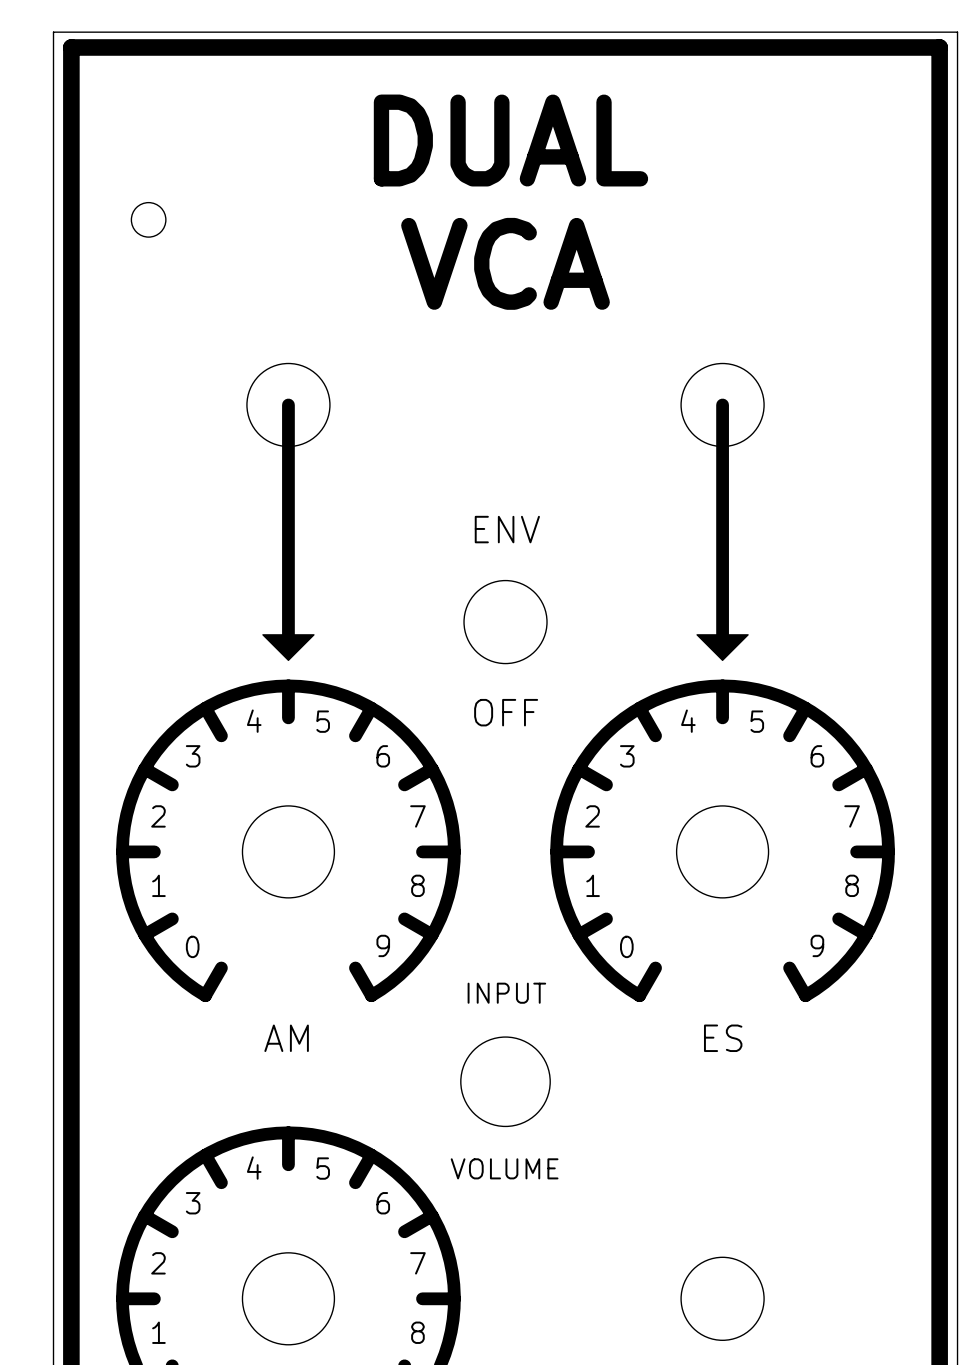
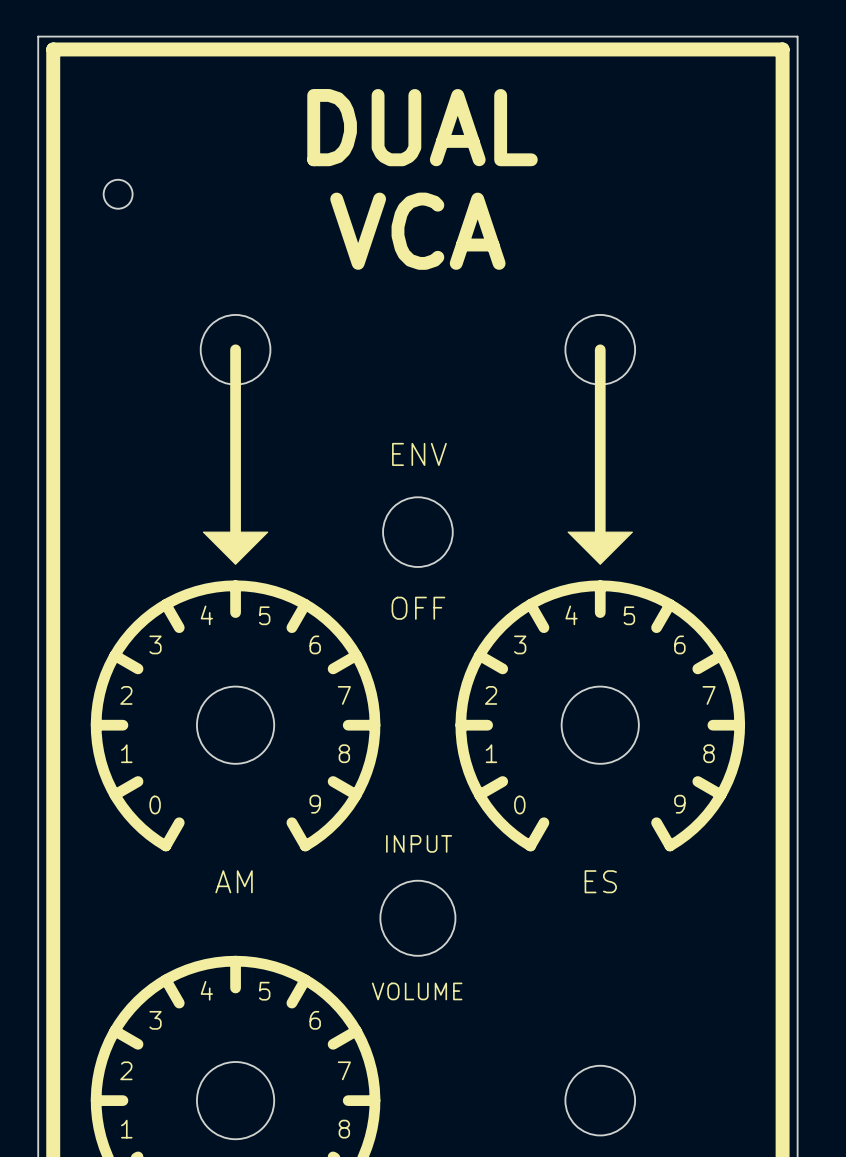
drawing shape: [262, 634, 315, 662] -> [202, 531, 269, 565]
drawing shape: [696, 634, 749, 662] -> [567, 531, 633, 565]

